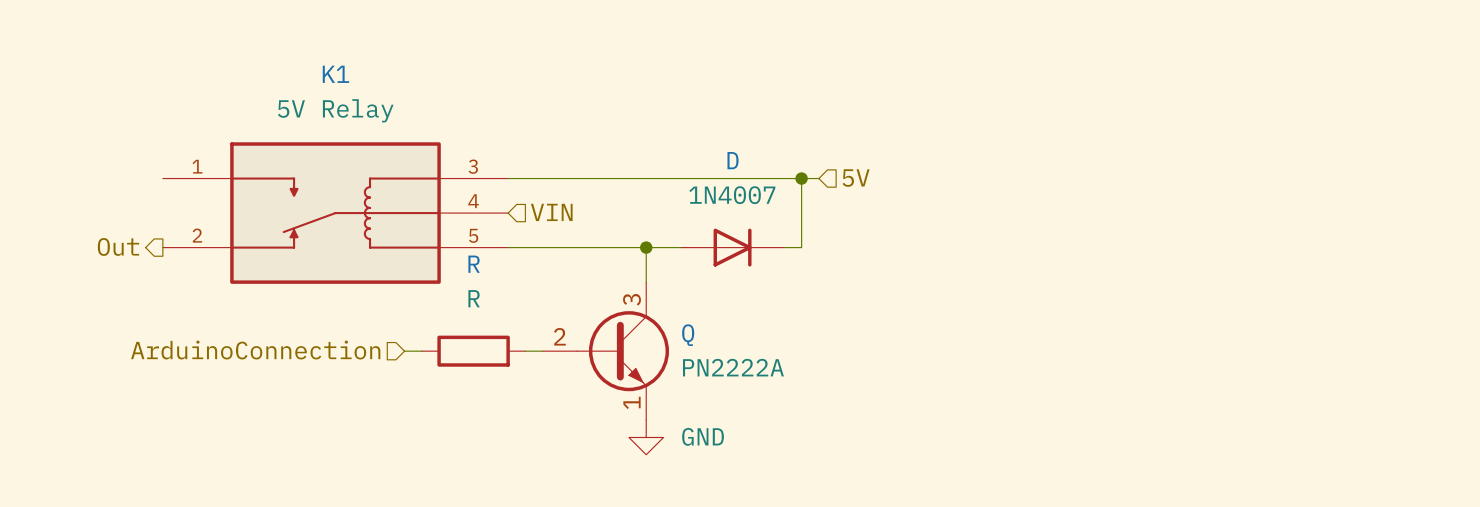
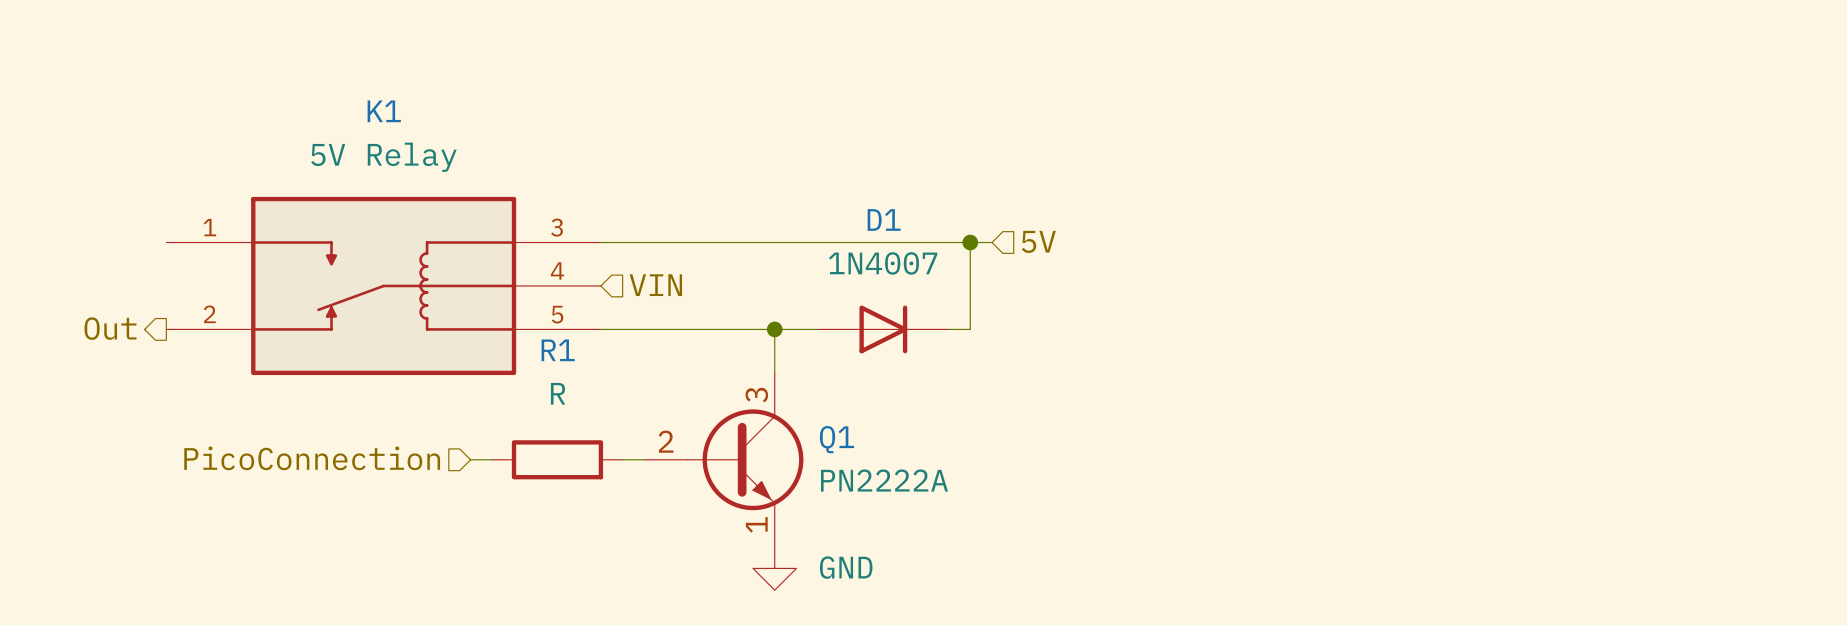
D name: D (733, 160) -> D1 (884, 219)
R name: R (474, 264) -> R1 (558, 350)
Q name: Q (688, 335) -> Q1 (837, 439)
hierarchical label: ArduinoConnection (255, 350) -> PicoConnection (312, 458)

